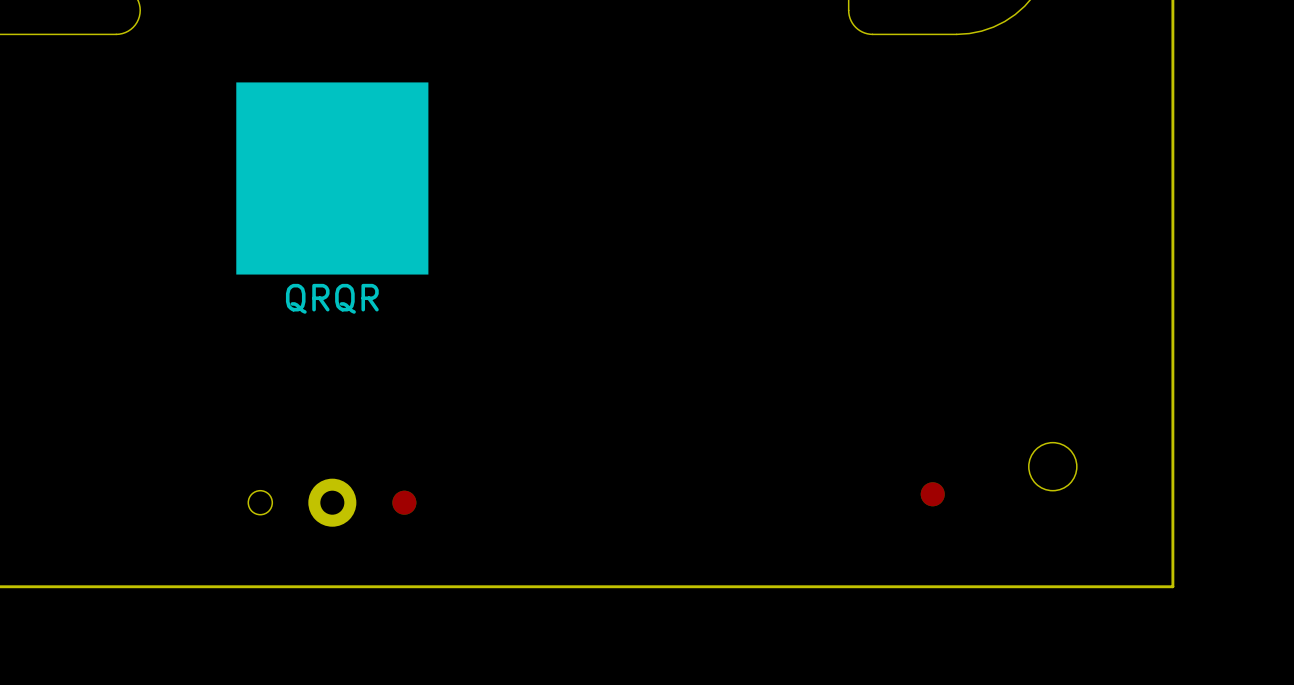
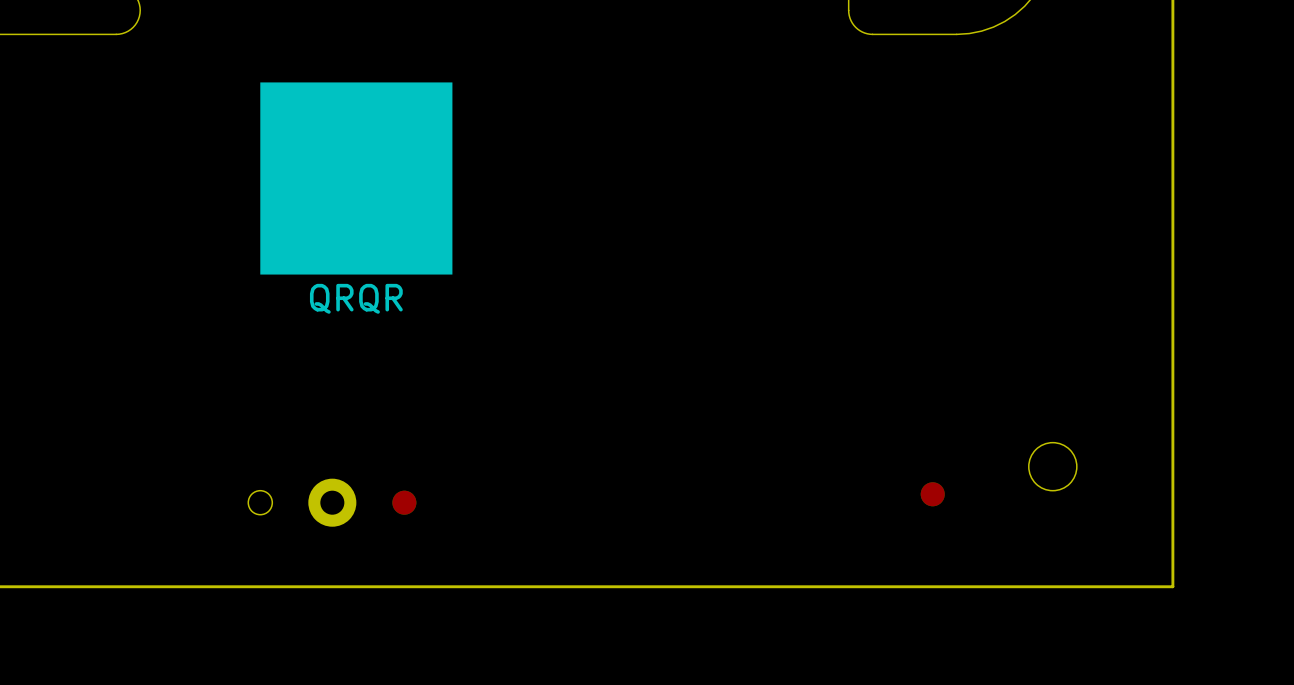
drawing position: (332, 178) -> (356, 178)
text position: QRQR (332, 298) -> QRQR (356, 298)

